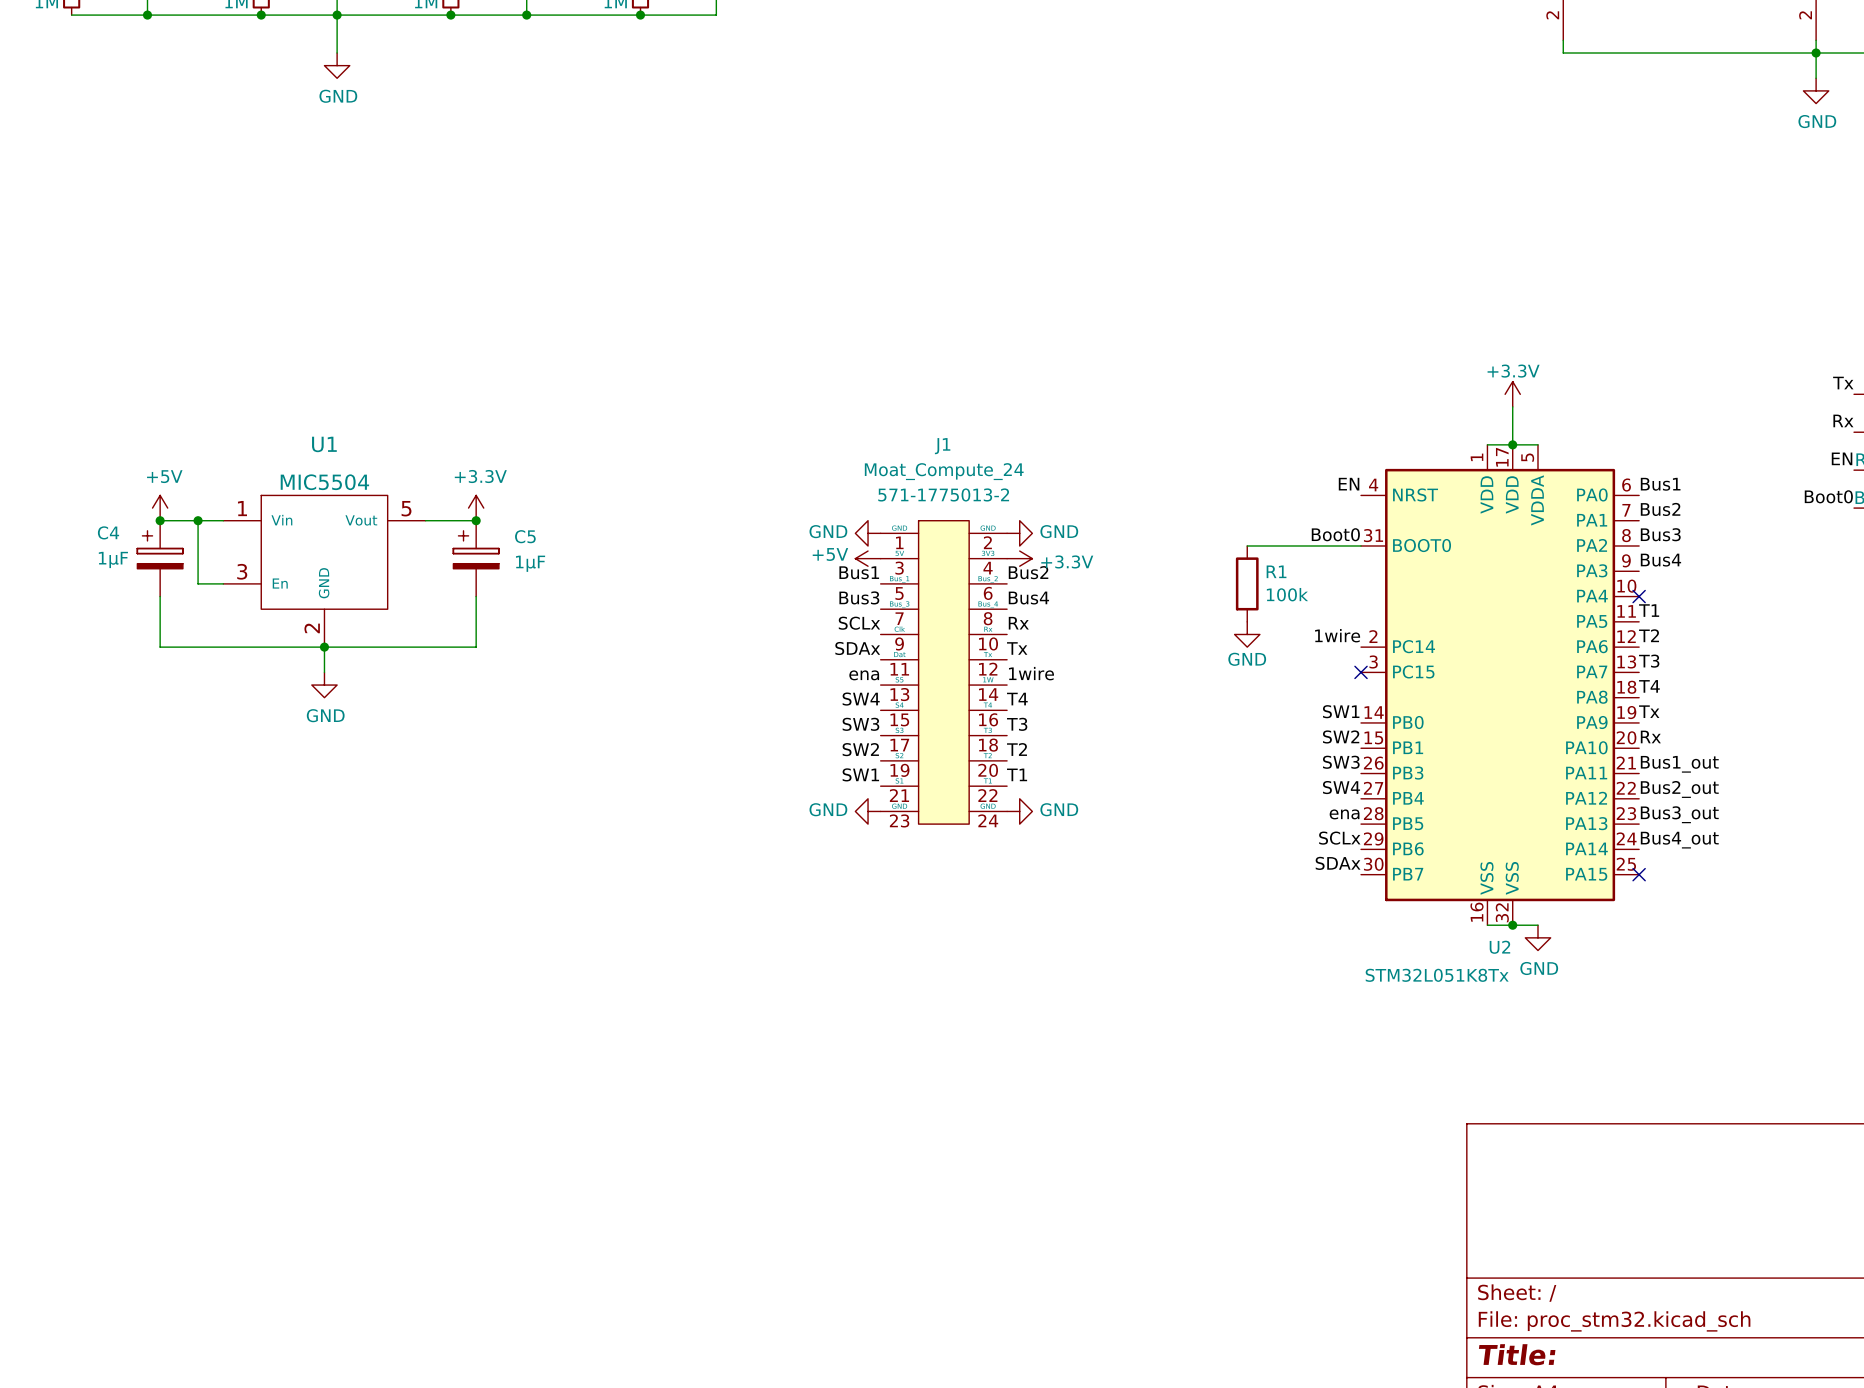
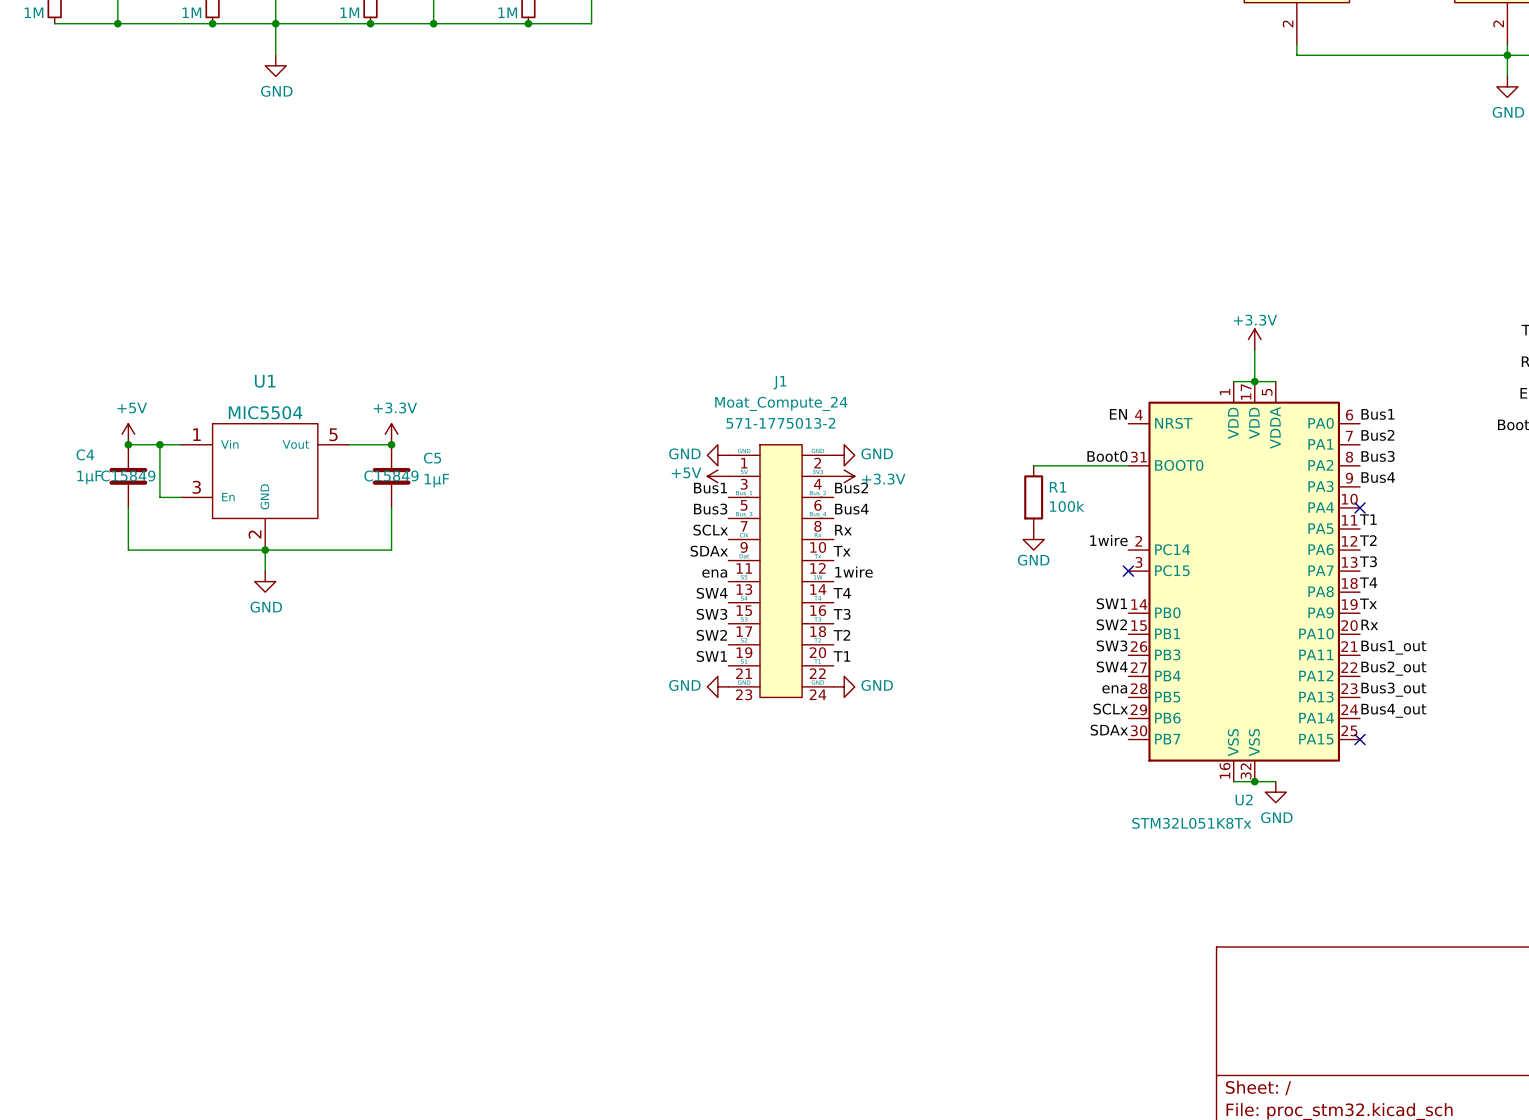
C4 symbol: [137, 520, 183, 597] -> [109, 444, 148, 508]
C5 symbol: [453, 520, 499, 597] -> [372, 444, 411, 508]
C4 text: none -> C15849 (128, 475)
C5 text: none -> C15849 (391, 475)

